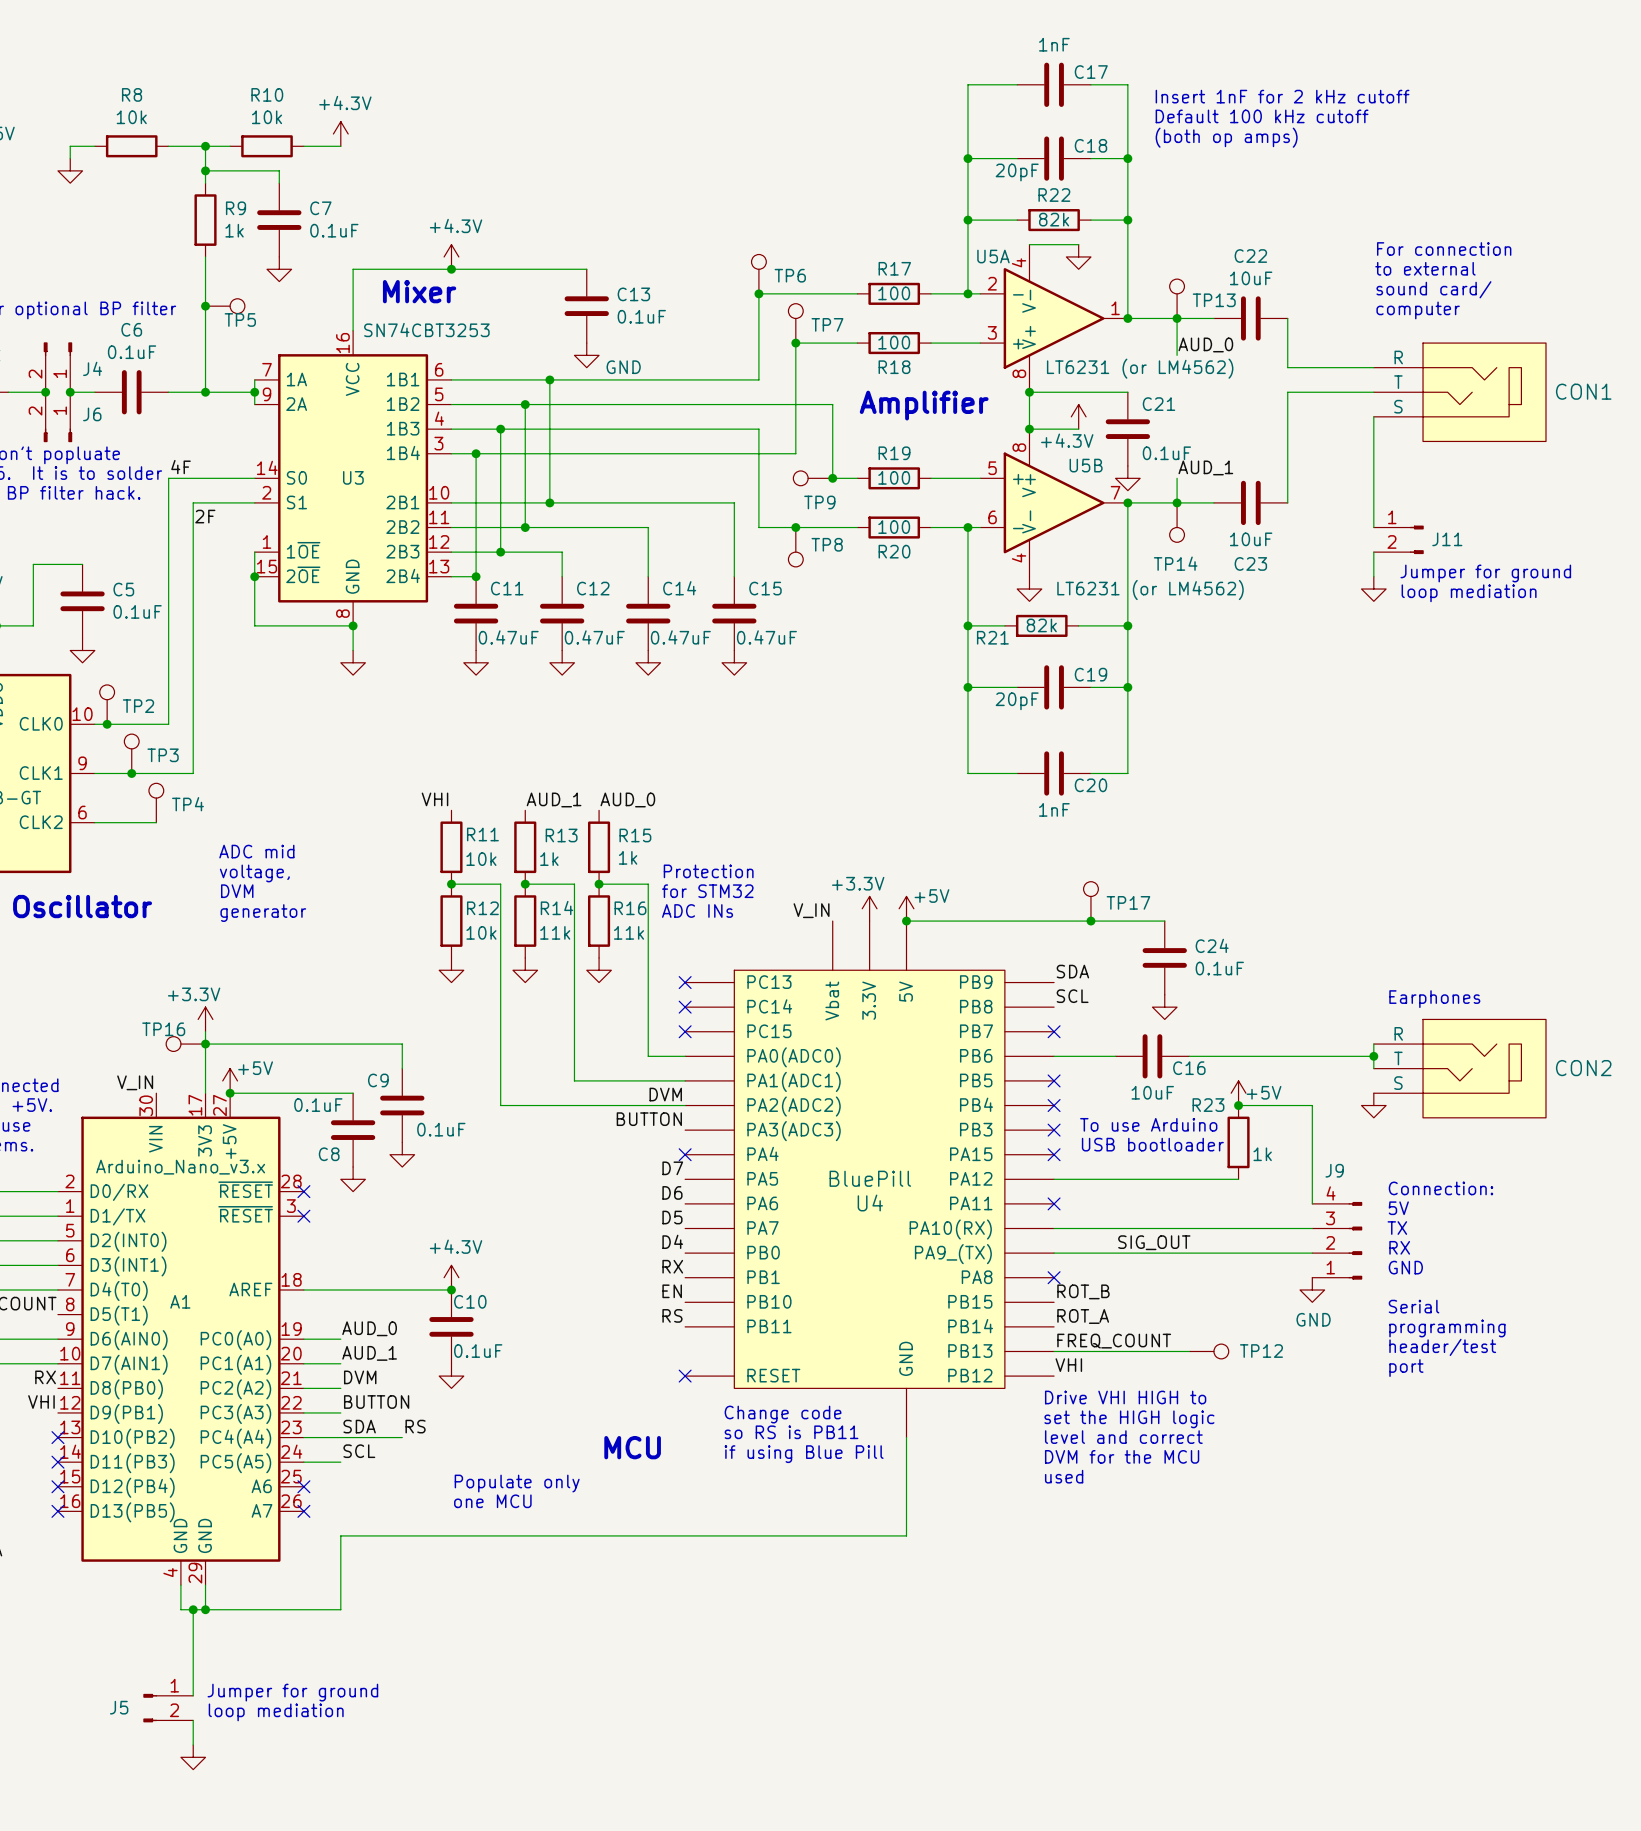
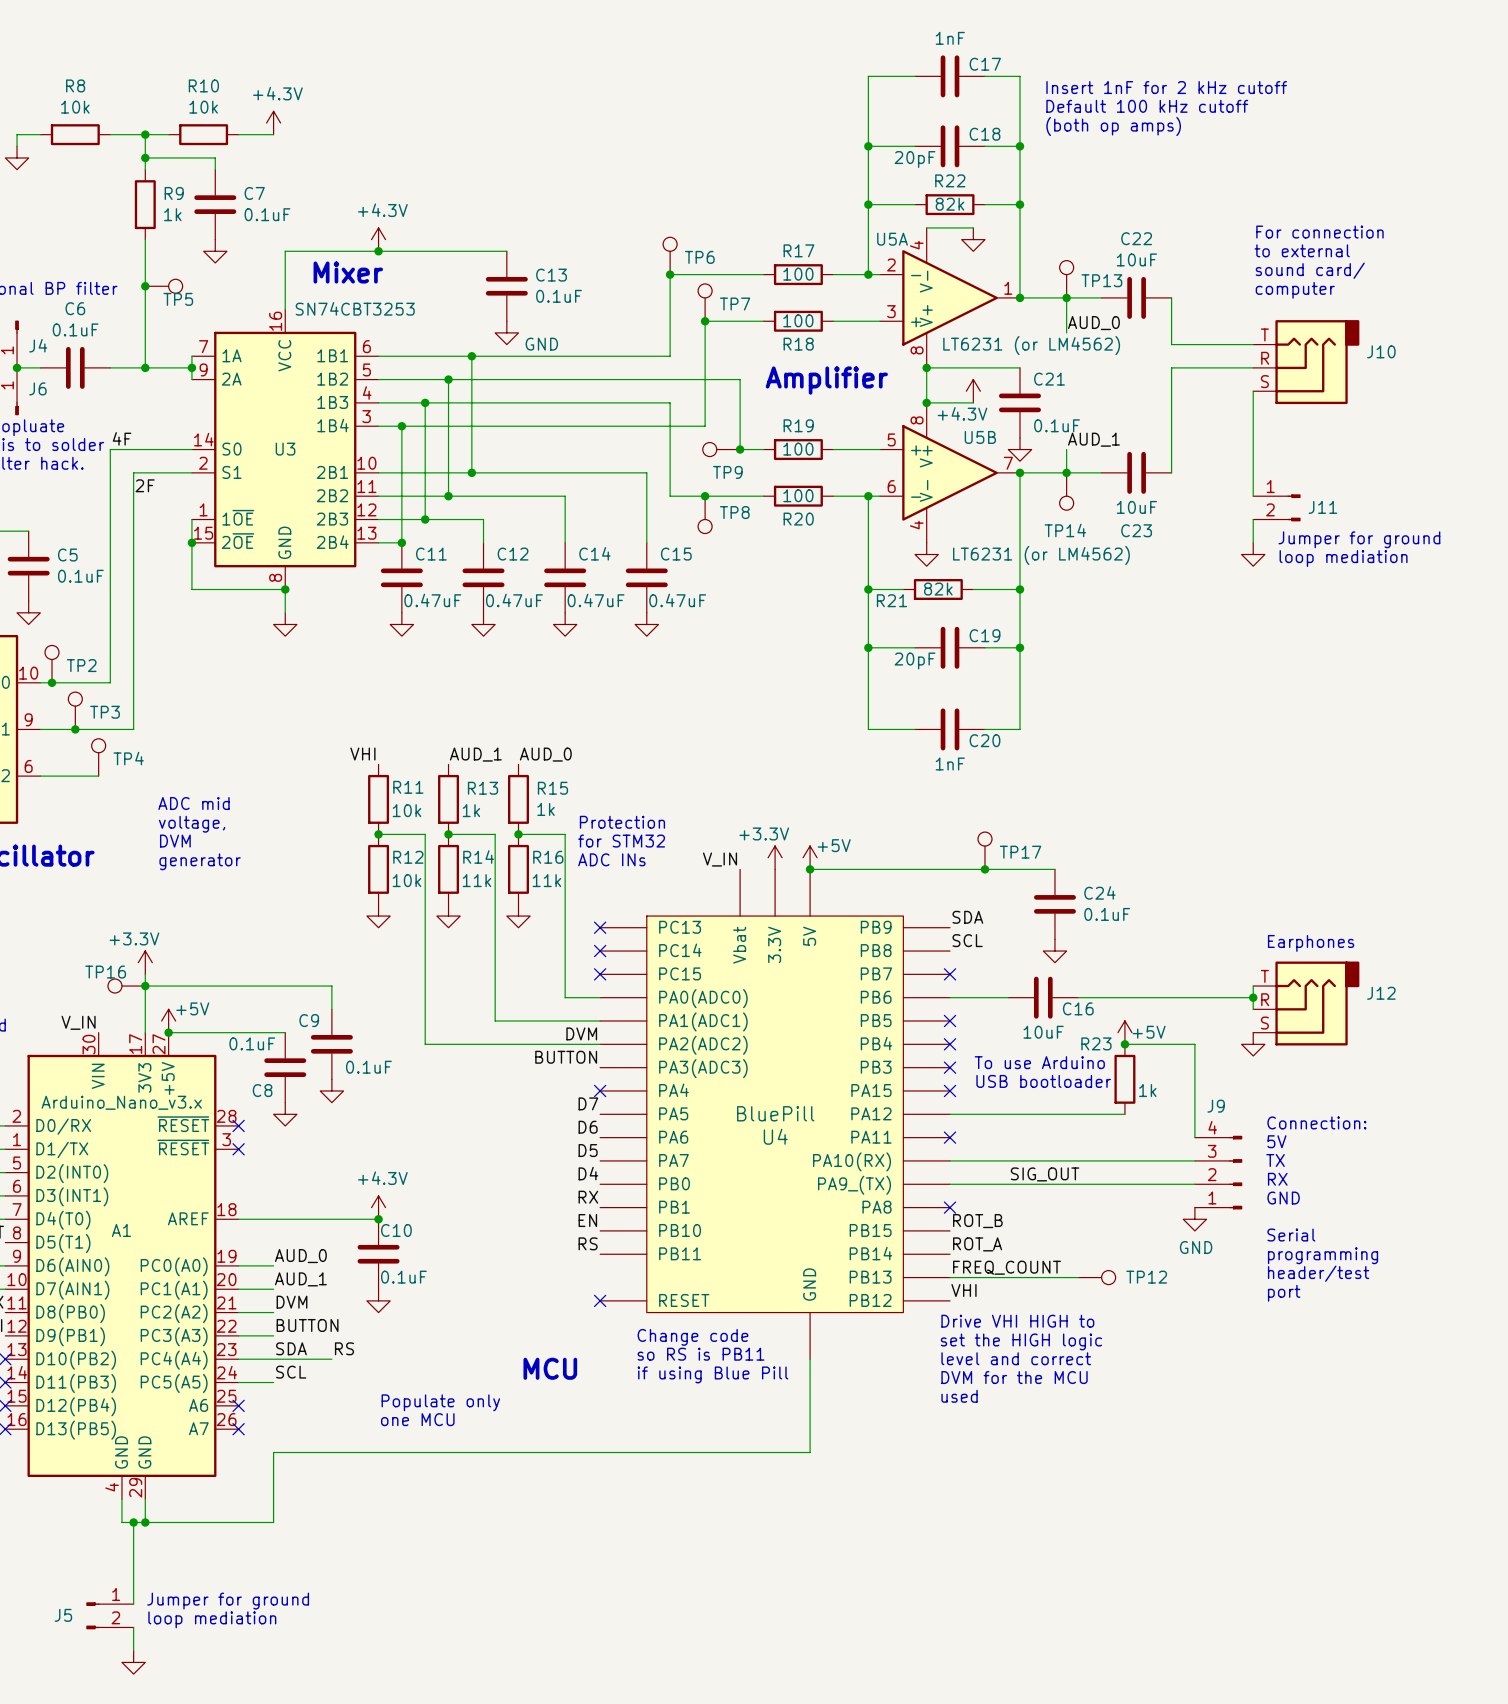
J10: none -> (1306, 362)
CON1: (1459, 392) -> none
J12: none -> (1306, 1003)
CON2: (1459, 1068) -> none

